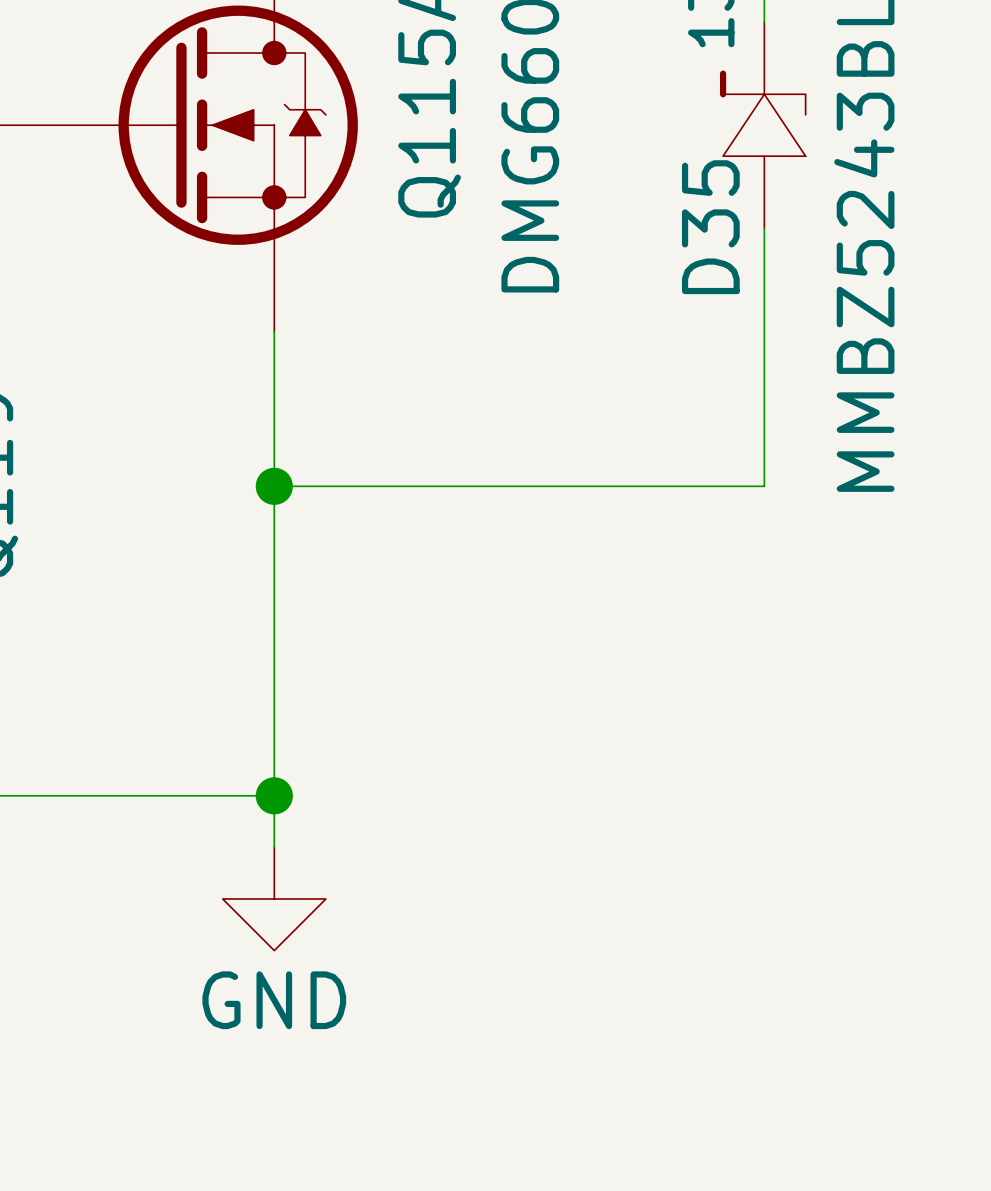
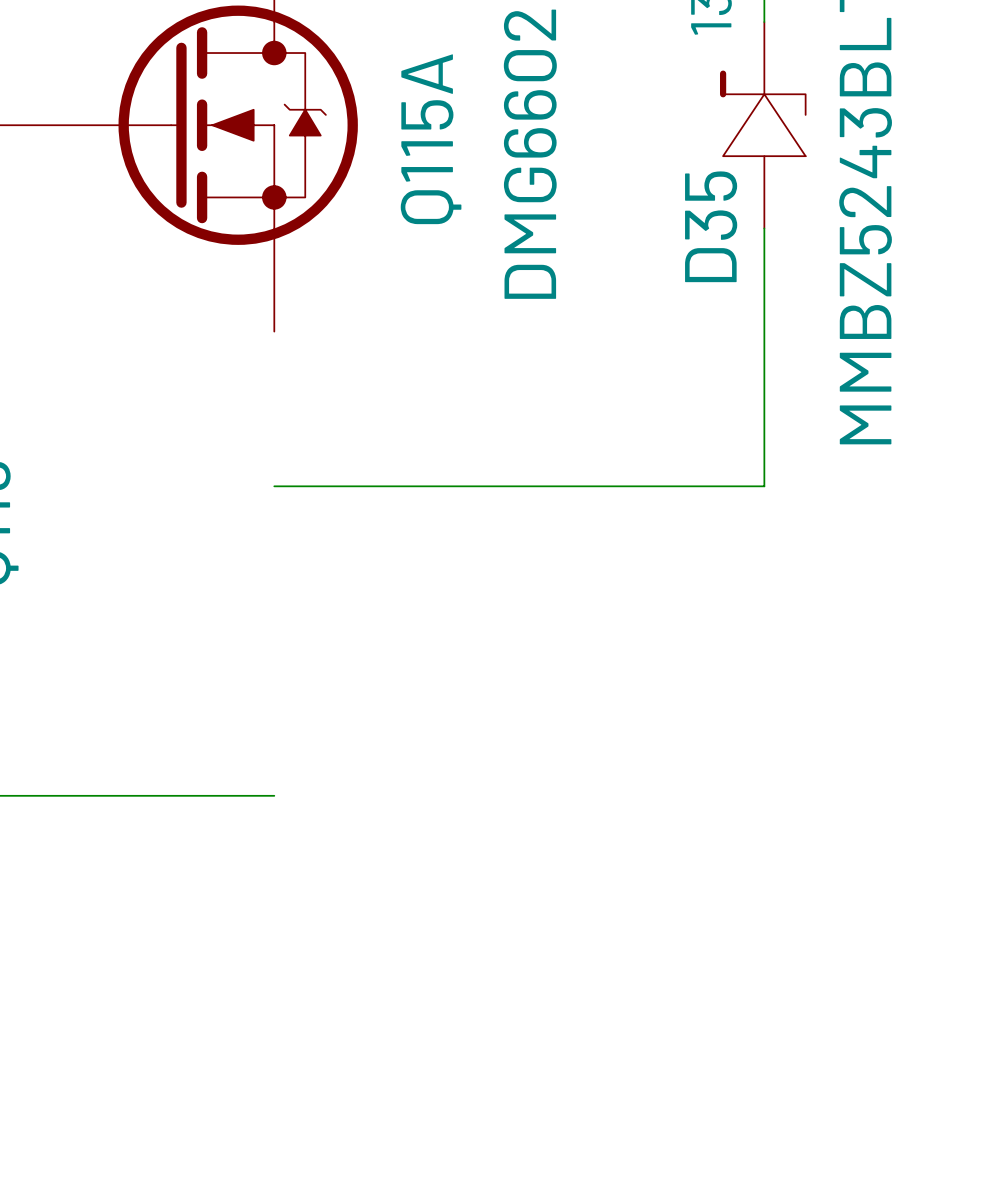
wire: (274, 331) (274, 847) -> none
junction: (274, 486) -> none
junction: (274, 795) -> none
power symbol: GND (274, 898) -> none

